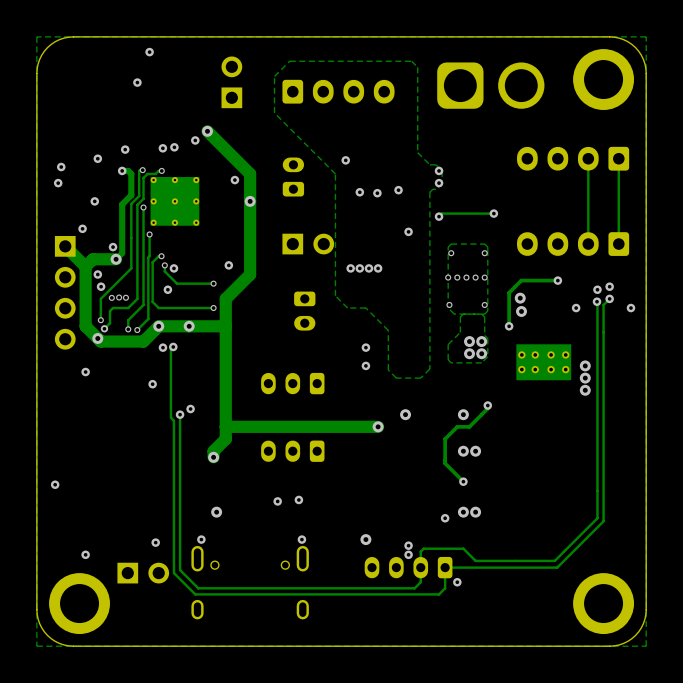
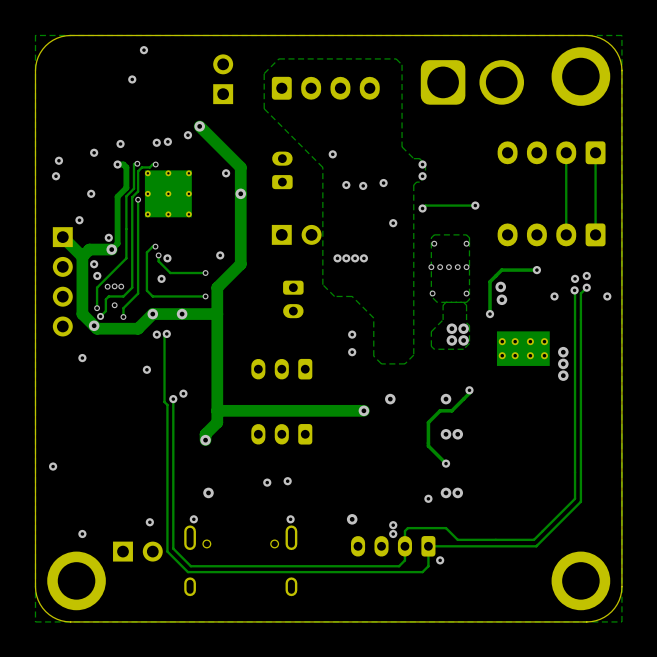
track: (149, 234) (148, 319) (137, 330) -> none
via: (149, 234) -> none
via position: (137, 330) -> (114, 305)

